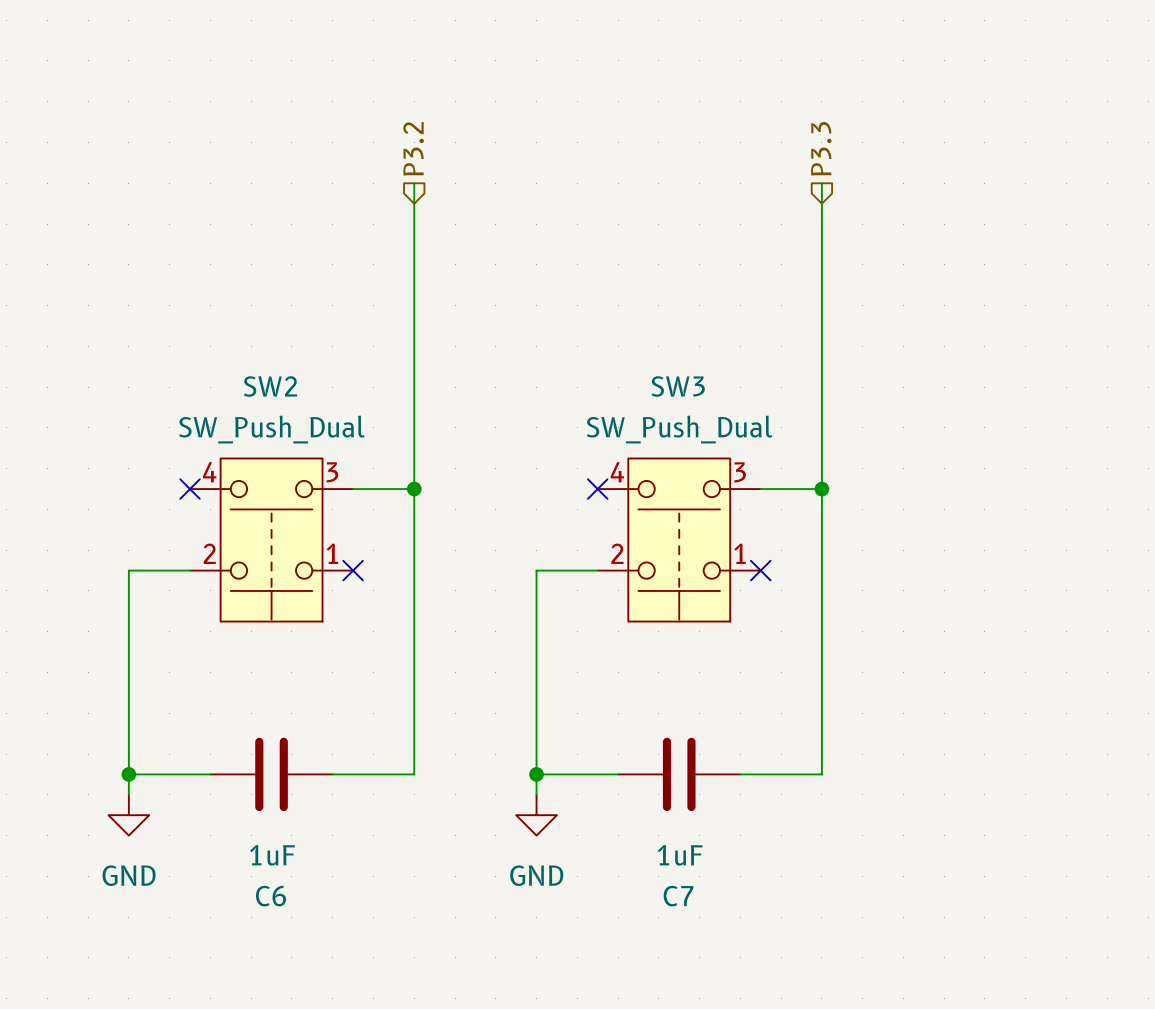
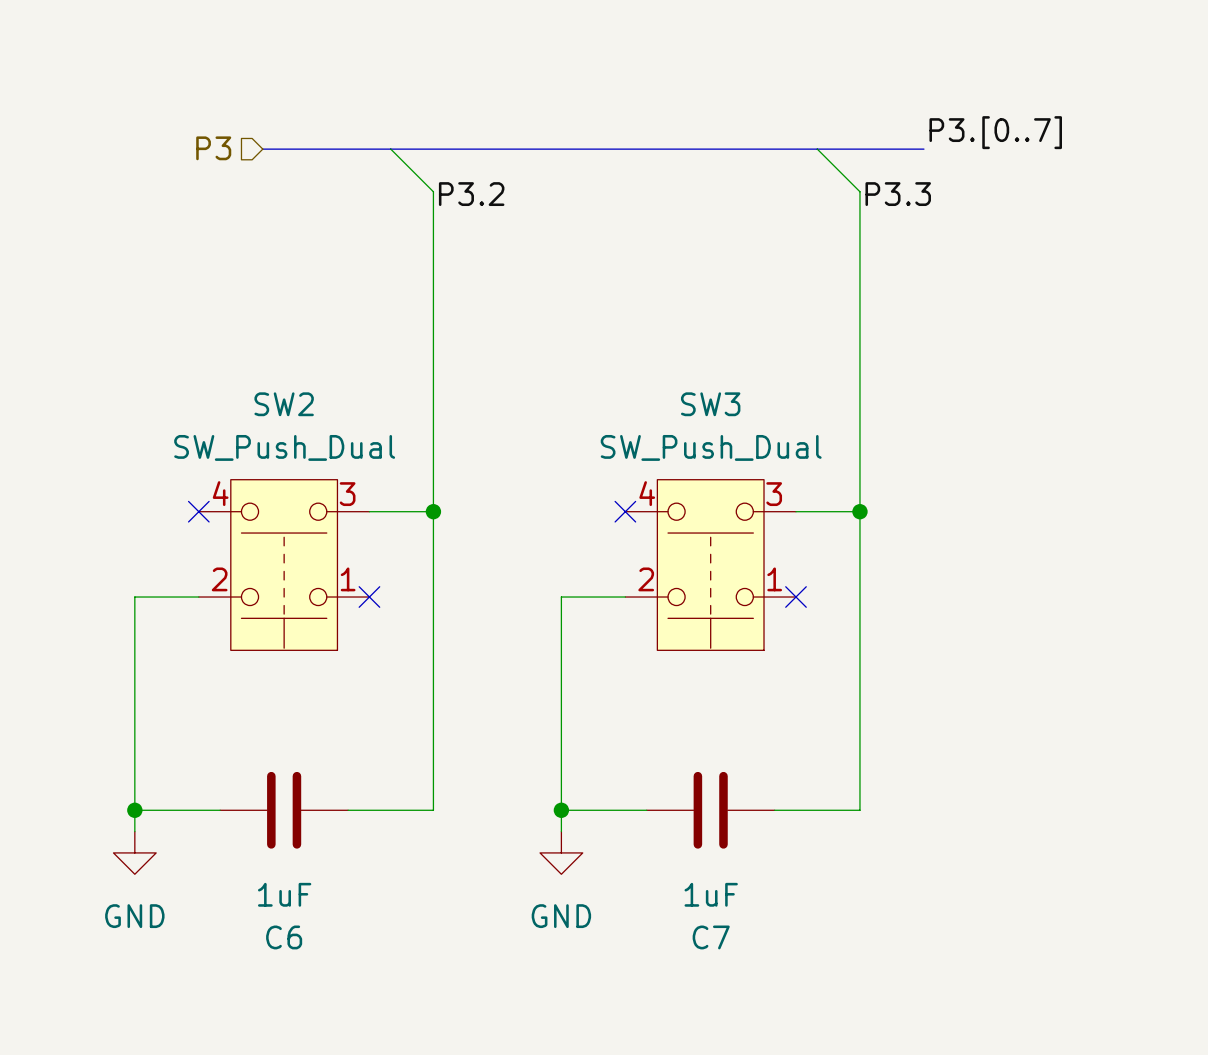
label: none -> P3.[0..7] (995, 132)
hierarchical label: none -> P3 (213, 148)
bus: none -> (262, 149) (923, 149)
wire: none -> (390, 149) (433, 191)
wire: none -> (817, 149) (859, 191)
hierarchical label: P3.2 (413, 148) -> none
hierarchical label: P3.3 (821, 148) -> none
label: none -> P3.2 (471, 194)
label: none -> P3.3 (898, 194)

